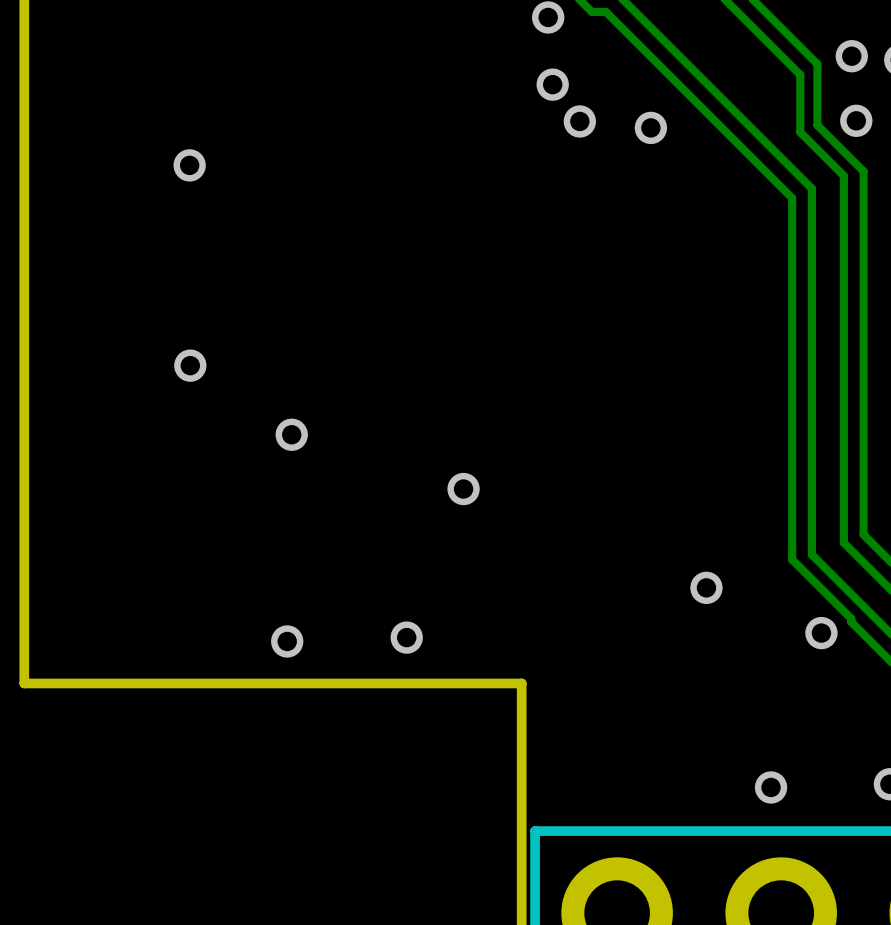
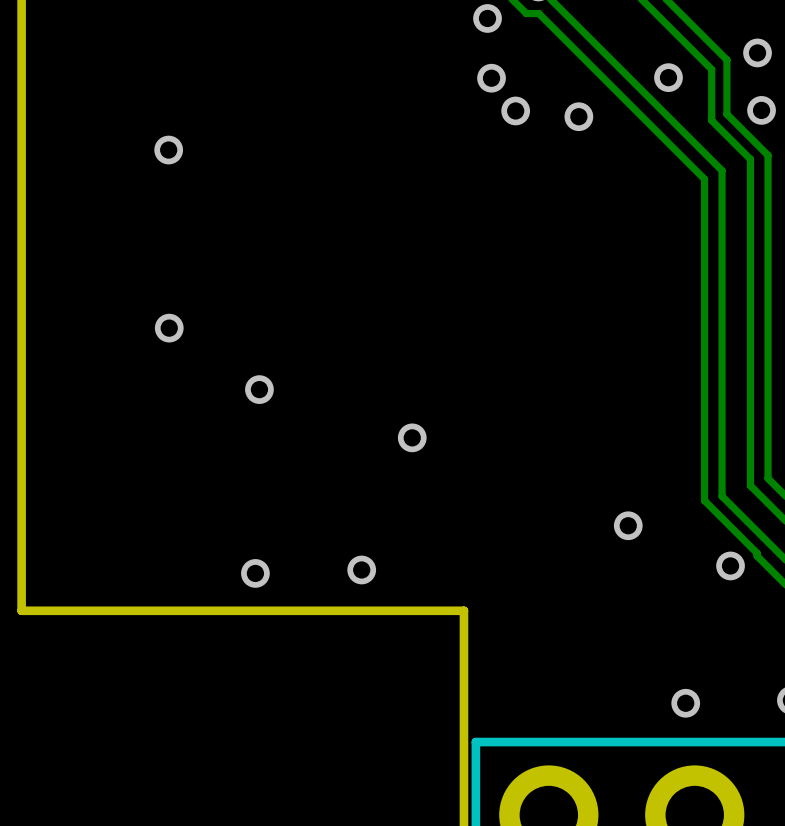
via: none -> (668, 77)

